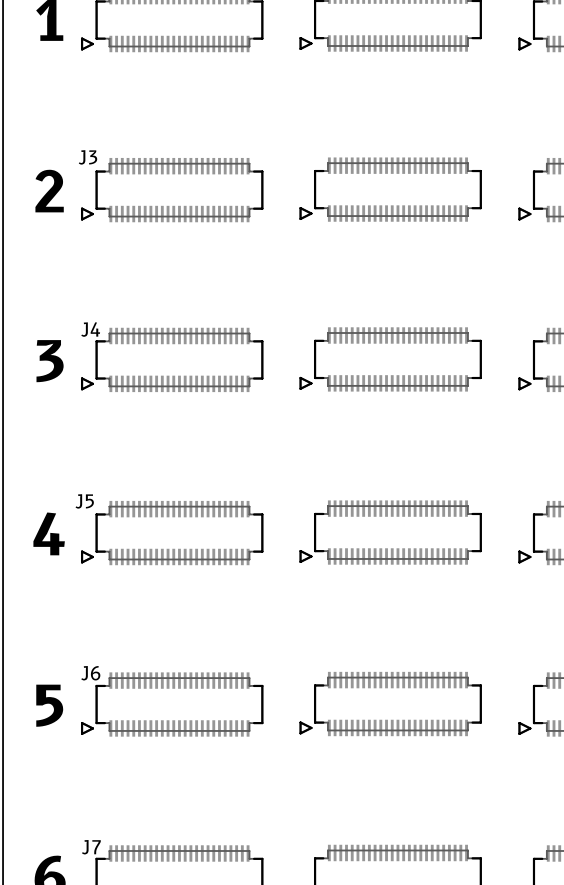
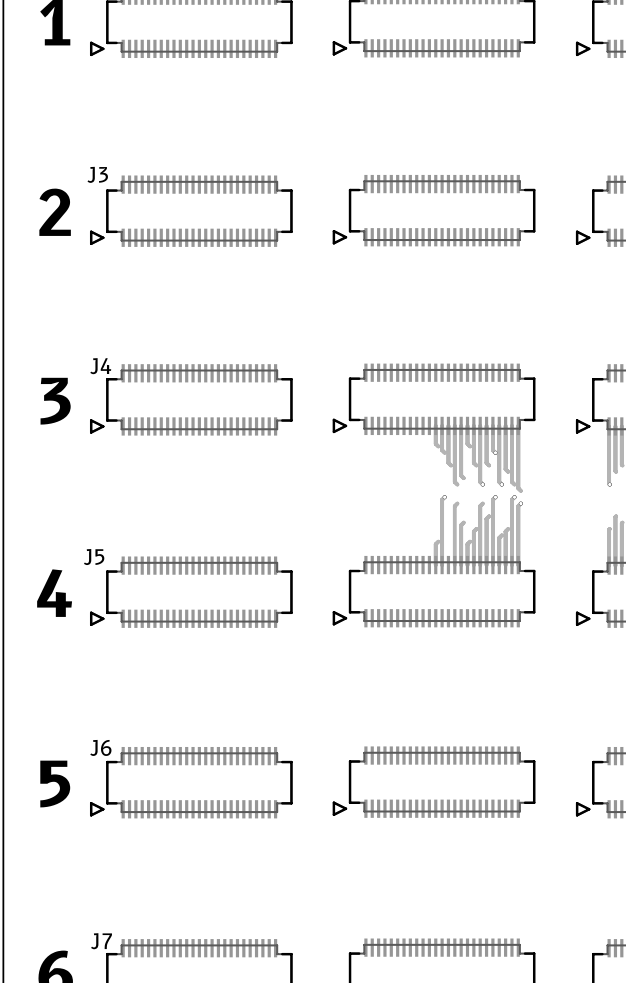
track: none -> (435, 425) (435, 443) (438, 446)
track: none -> (442, 425) (442, 450) (444, 452)
track: none -> (448, 425) (448, 462) (451, 465)
track: none -> (454, 425) (454, 481) (457, 484)
track: none -> (461, 425) (461, 475) (463, 478)
track: none -> (467, 425) (467, 443) (470, 446)
track: none -> (473, 425) (473, 462) (476, 465)
track: none -> (480, 425) (480, 481) (482, 484)
track: none -> (486, 425) (486, 462) (489, 465)
track: none -> (492, 425) (492, 450) (495, 452)
track: none -> (499, 425) (499, 481) (501, 484)
track: none -> (505, 425) (505, 469) (508, 471)
track: none -> (511, 425) (511, 481) (514, 484)
track: none -> (518, 425) (518, 488) (520, 490)
track: none -> (609, 426) (609, 484)
track: none -> (615, 426) (616, 471)
track: none -> (621, 426) (622, 465)
via: none -> (495, 452)
via: none -> (482, 484)
via: none -> (501, 484)
via: none -> (609, 484)
track: none -> (444, 497) (442, 499) (442, 565)
via: none -> (444, 497)
track: none -> (495, 497) (492, 499) (492, 565)
via: none -> (495, 497)
track: none -> (514, 497) (511, 499) (511, 565)
via: none -> (514, 497)
track: none -> (457, 503) (454, 506) (454, 565)
track: none -> (482, 503) (480, 506) (480, 565)
track: none -> (520, 503) (518, 506) (518, 565)
via: none -> (520, 503)
track: none -> (489, 516) (486, 518) (486, 565)
track: none -> (616, 516) (615, 565)
track: none -> (463, 522) (461, 525) (461, 565)
track: none -> (622, 522) (621, 565)
track: none -> (476, 528) (473, 531) (473, 565)
track: none -> (508, 528) (505, 531) (505, 565)
track: none -> (609, 528) (609, 565)
track: none -> (501, 535) (499, 537) (499, 565)
track: none -> (438, 541) (435, 544) (435, 565)
track: none -> (470, 541) (467, 544) (467, 565)

